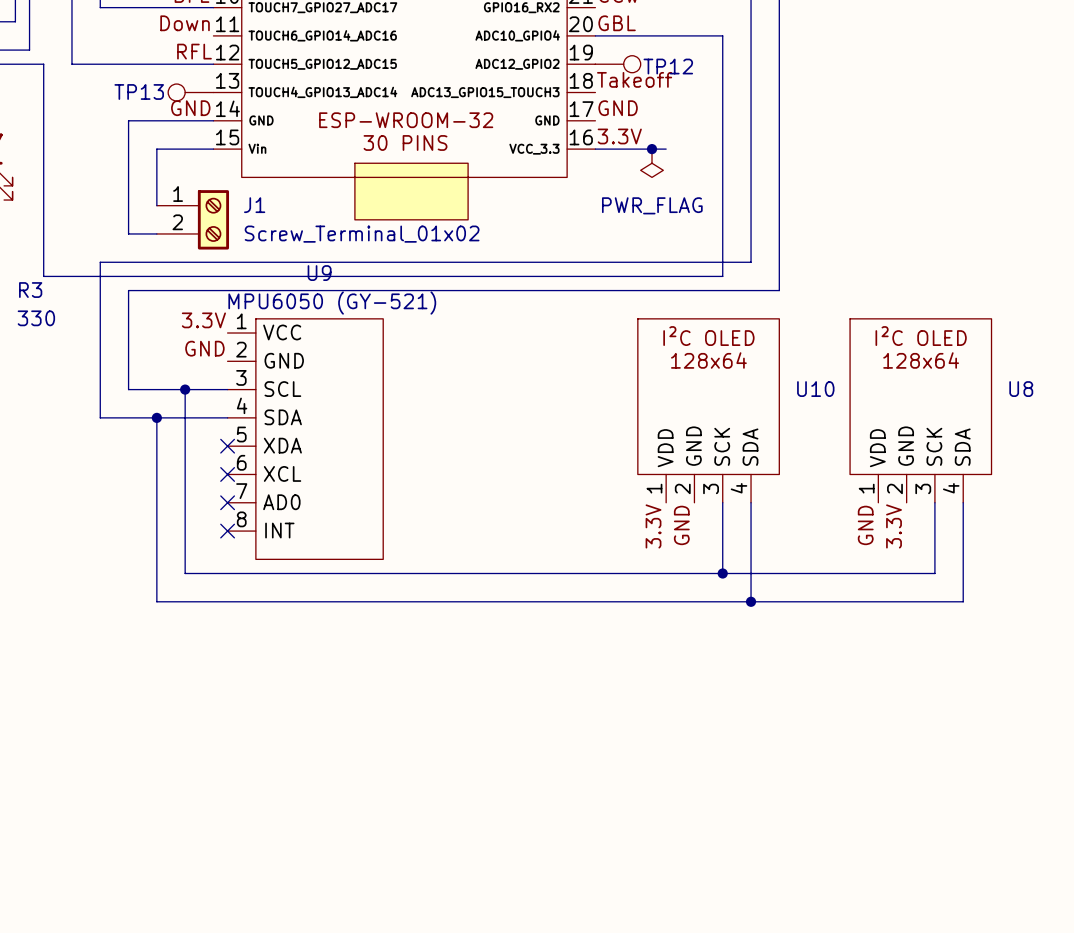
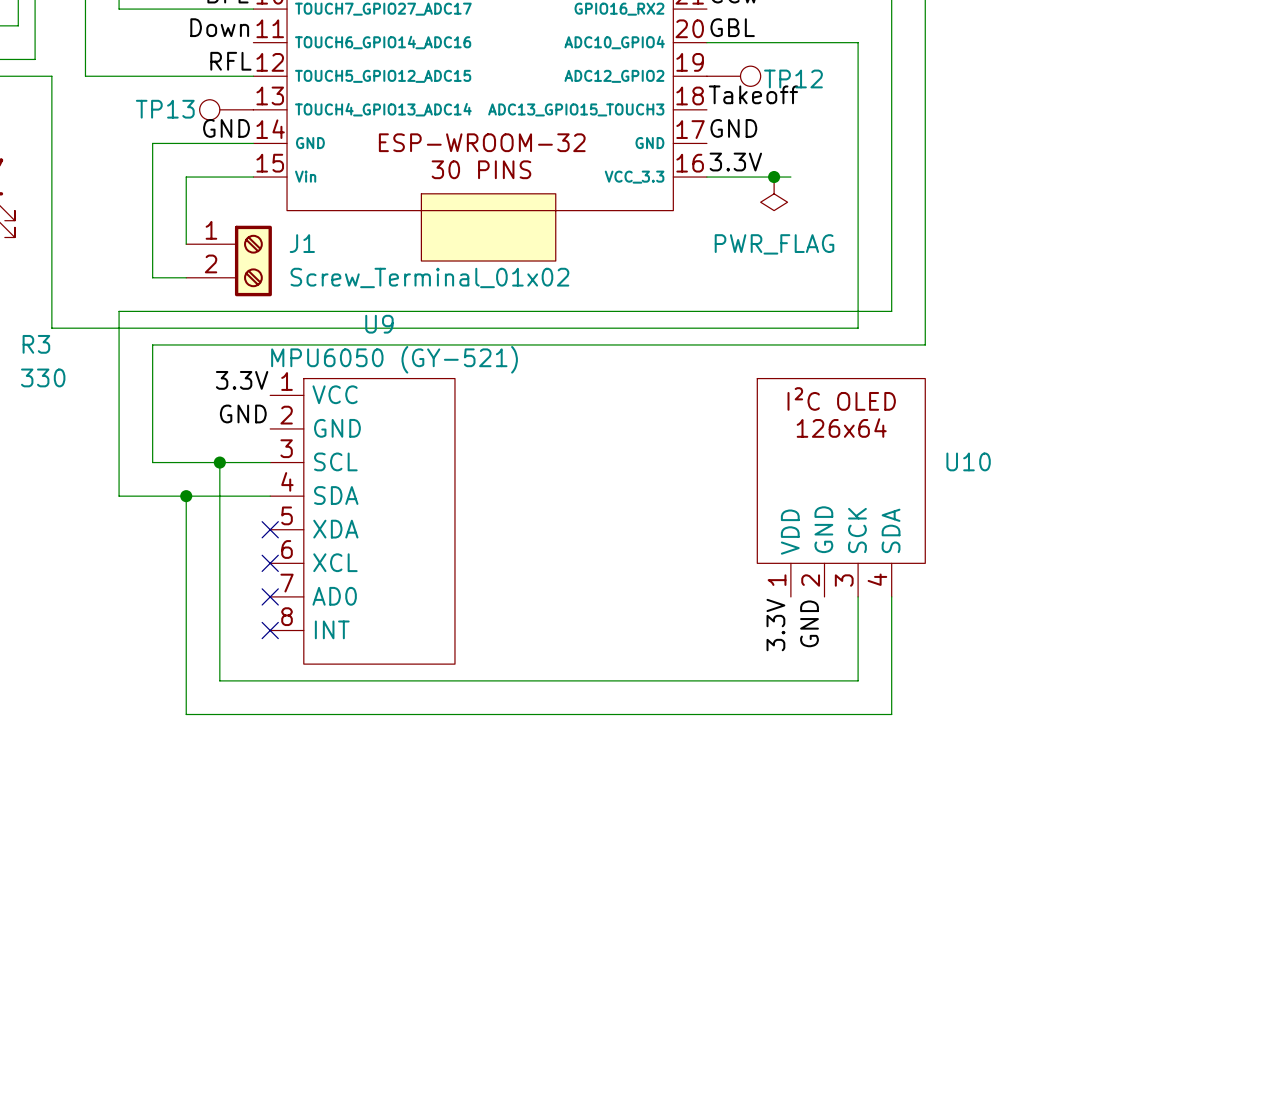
U10 text: 128x64 (708, 360) -> 126x64 (841, 428)
U8: (920, 410) -> none
wire: (934, 502) (934, 573) (722, 573) -> none
wire: (963, 502) (963, 601) (751, 601) -> none
label: GND (865, 525) -> none
label: 3.3V (894, 526) -> none
junction: (722, 573) -> none
junction: (751, 601) -> none

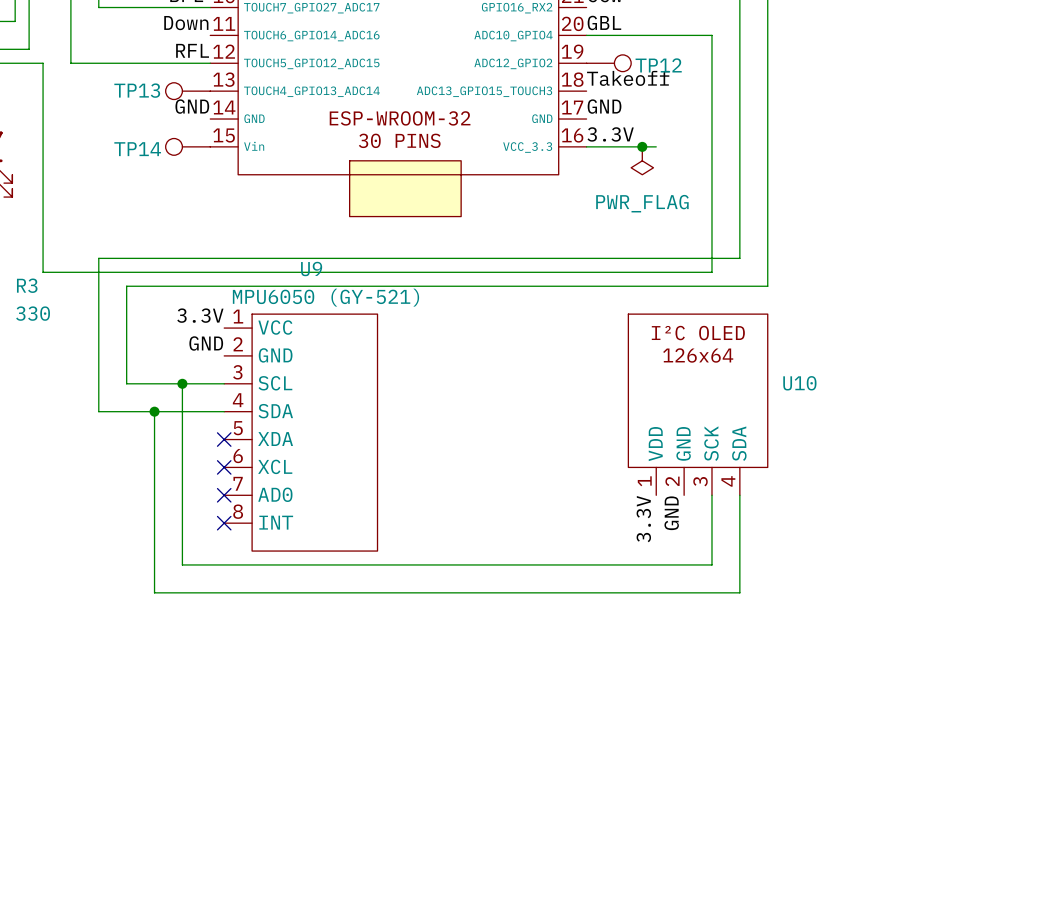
wire: (253, 143) (152, 143) (152, 277) (186, 277) -> none
TP14: none -> (187, 146)
wire: (253, 177) (186, 177) (186, 244) -> none
J1: Screw_Terminal_01x02 (229, 261) -> none

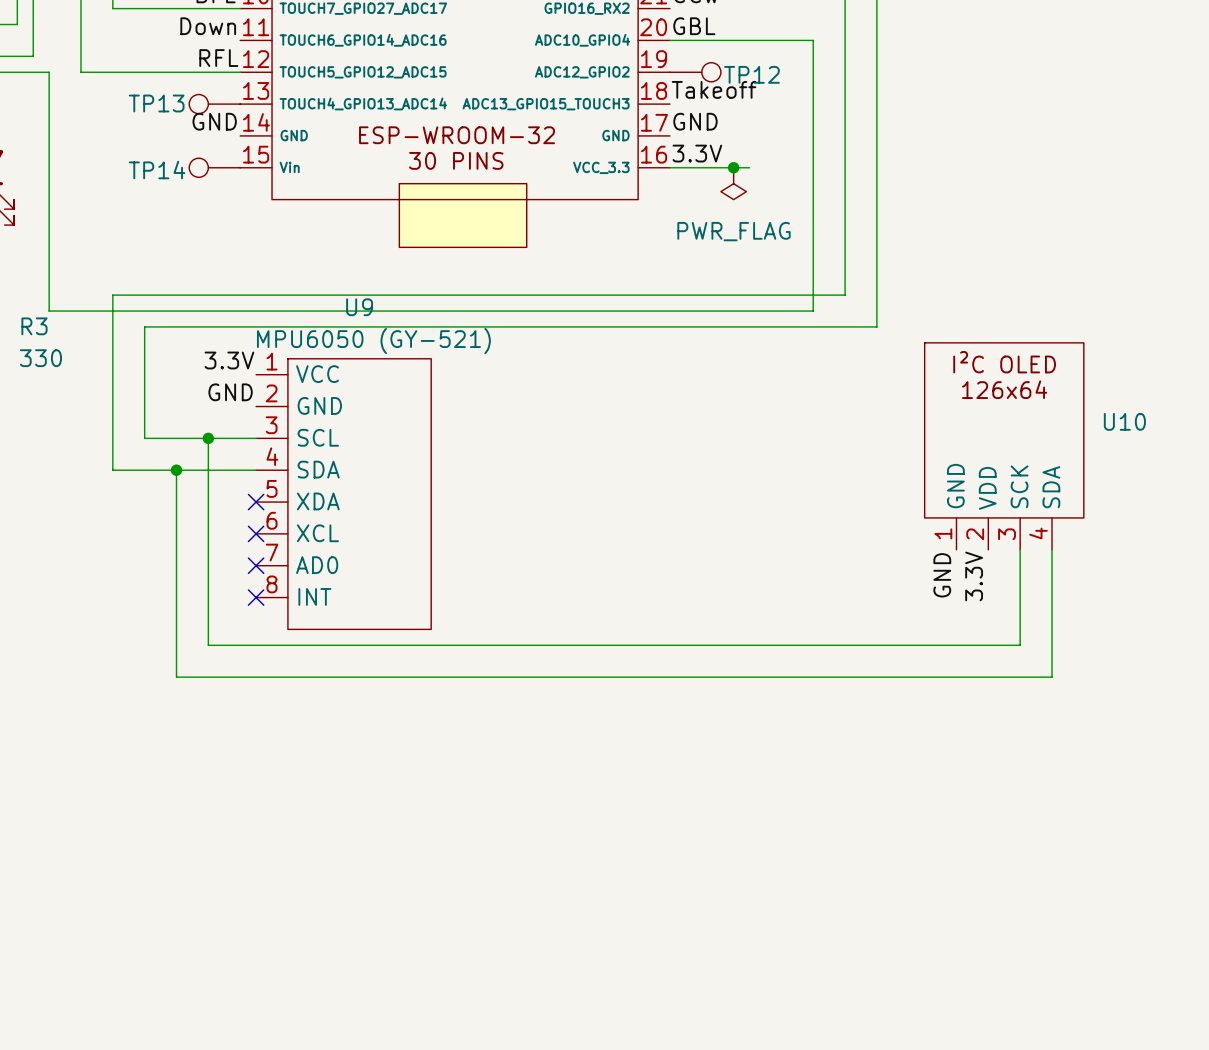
U10 position: (698, 404) -> (1004, 446)
U10 pin name: GND (683, 443) -> VDD (987, 488)
U10 pin name: VDD (655, 444) -> GND (955, 486)
wire: (711, 495) (711, 564) -> (1020, 549) (1020, 645) (813, 645)
wire: (739, 495) (739, 592) -> (1051, 549) (1051, 677) (845, 677)
label position: GND (671, 513) -> GND (942, 575)
label position: 3.3V (643, 519) -> 3.3V (974, 576)

